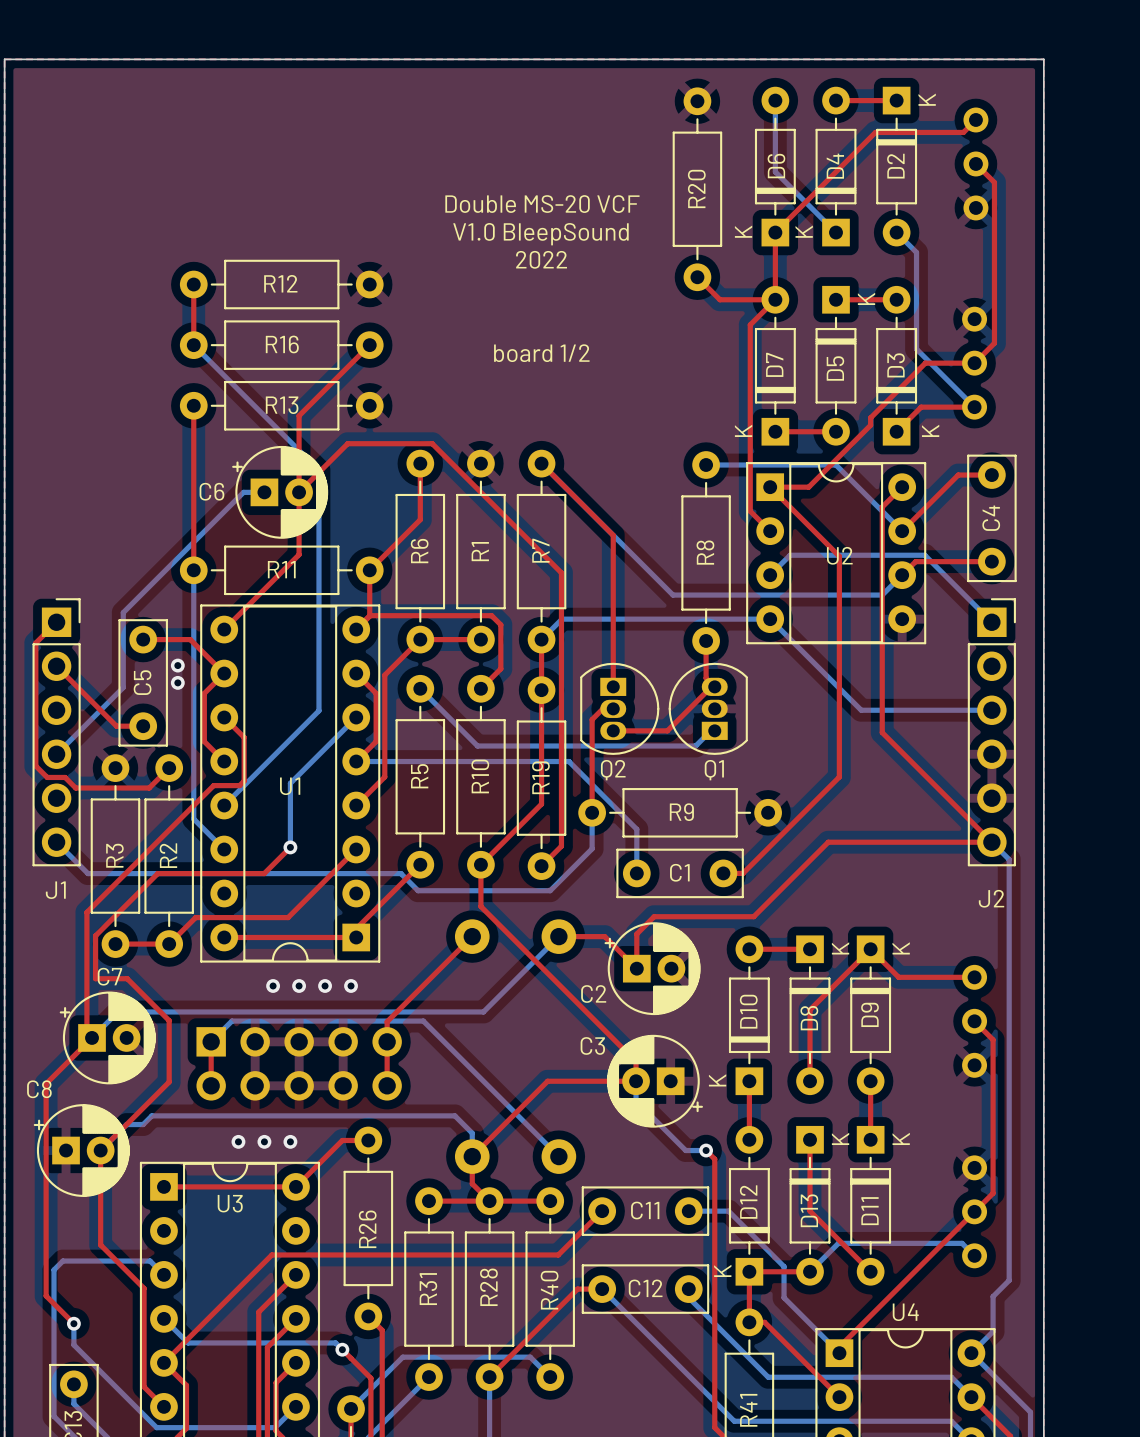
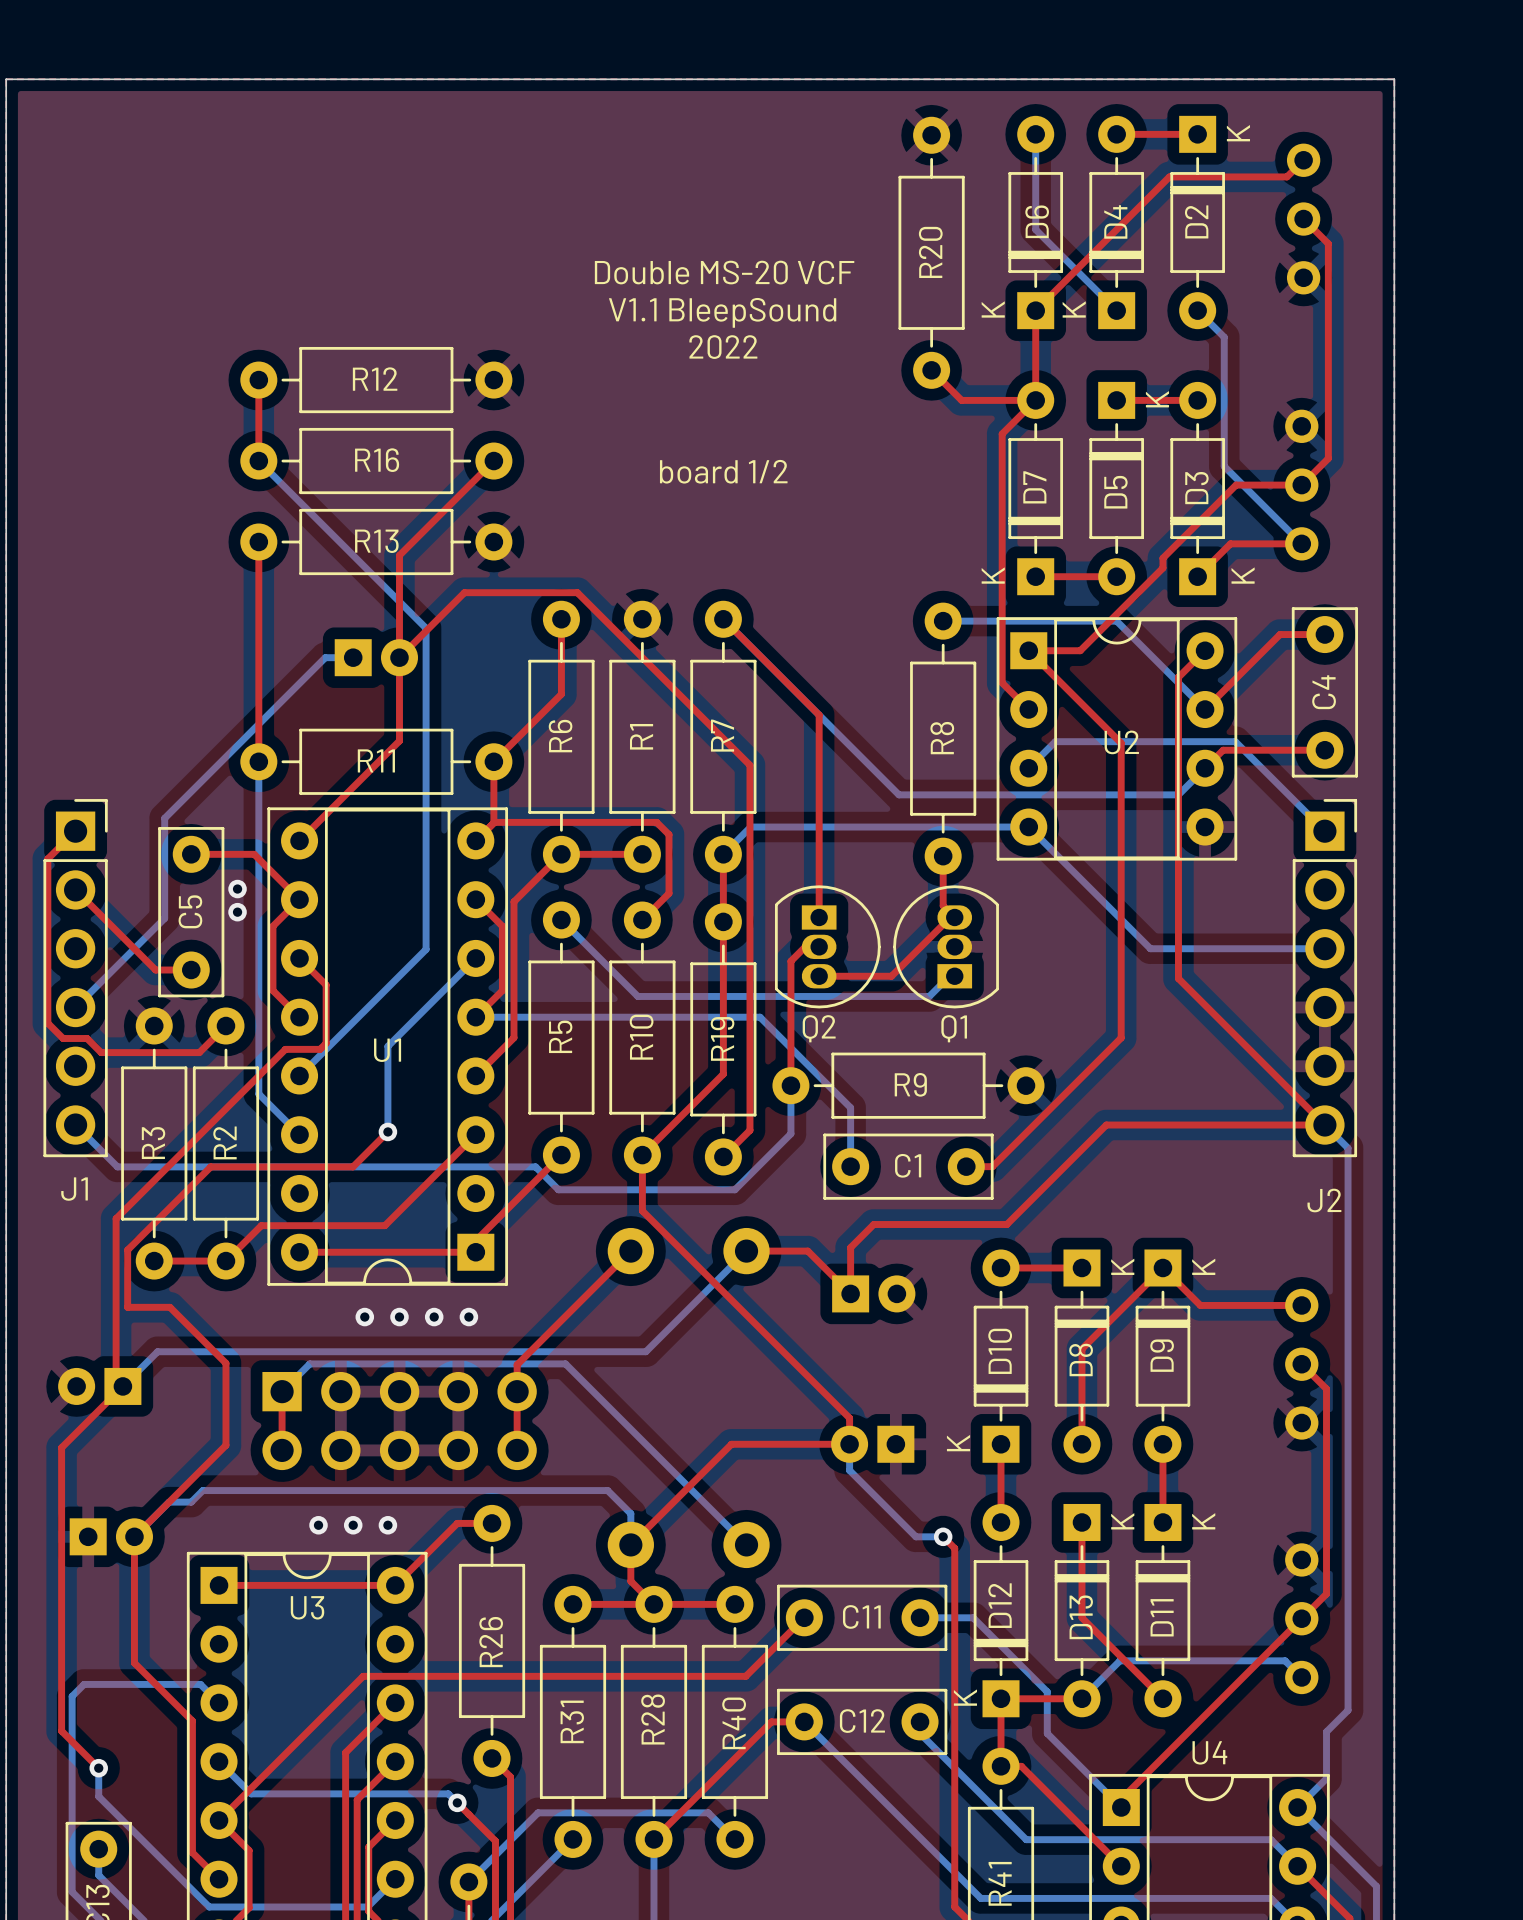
text: V1.0 BleepSound (540, 234) -> V1.1 BleepSound (722, 312)
C6 side: top (280, 492) -> bottom (376, 657)
C2 side: top (652, 968) -> bottom (873, 1293)
C7 side: top (107, 1037) -> bottom (99, 1386)
C3 side: top (654, 1081) -> bottom (872, 1444)
C8 side: top (81, 1150) -> bottom (111, 1536)

